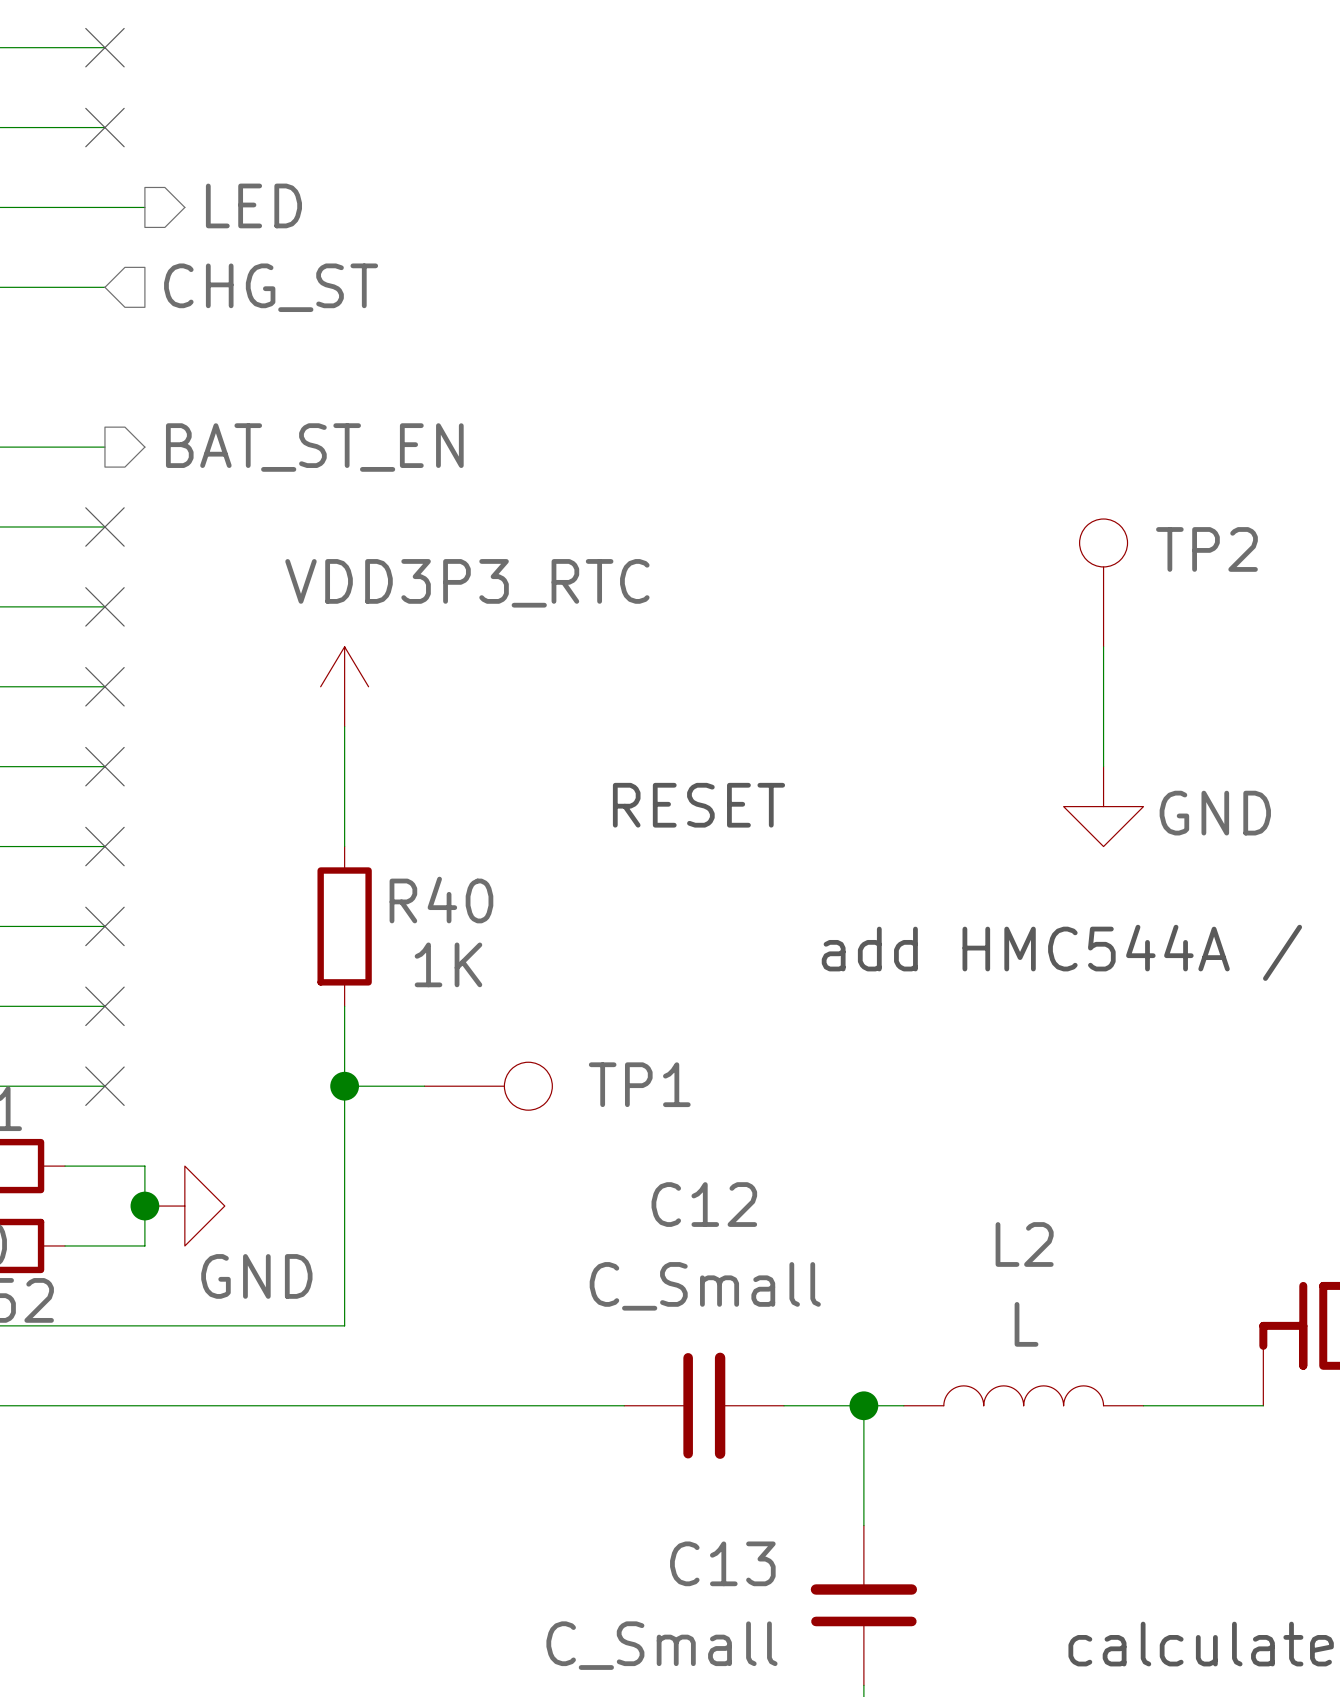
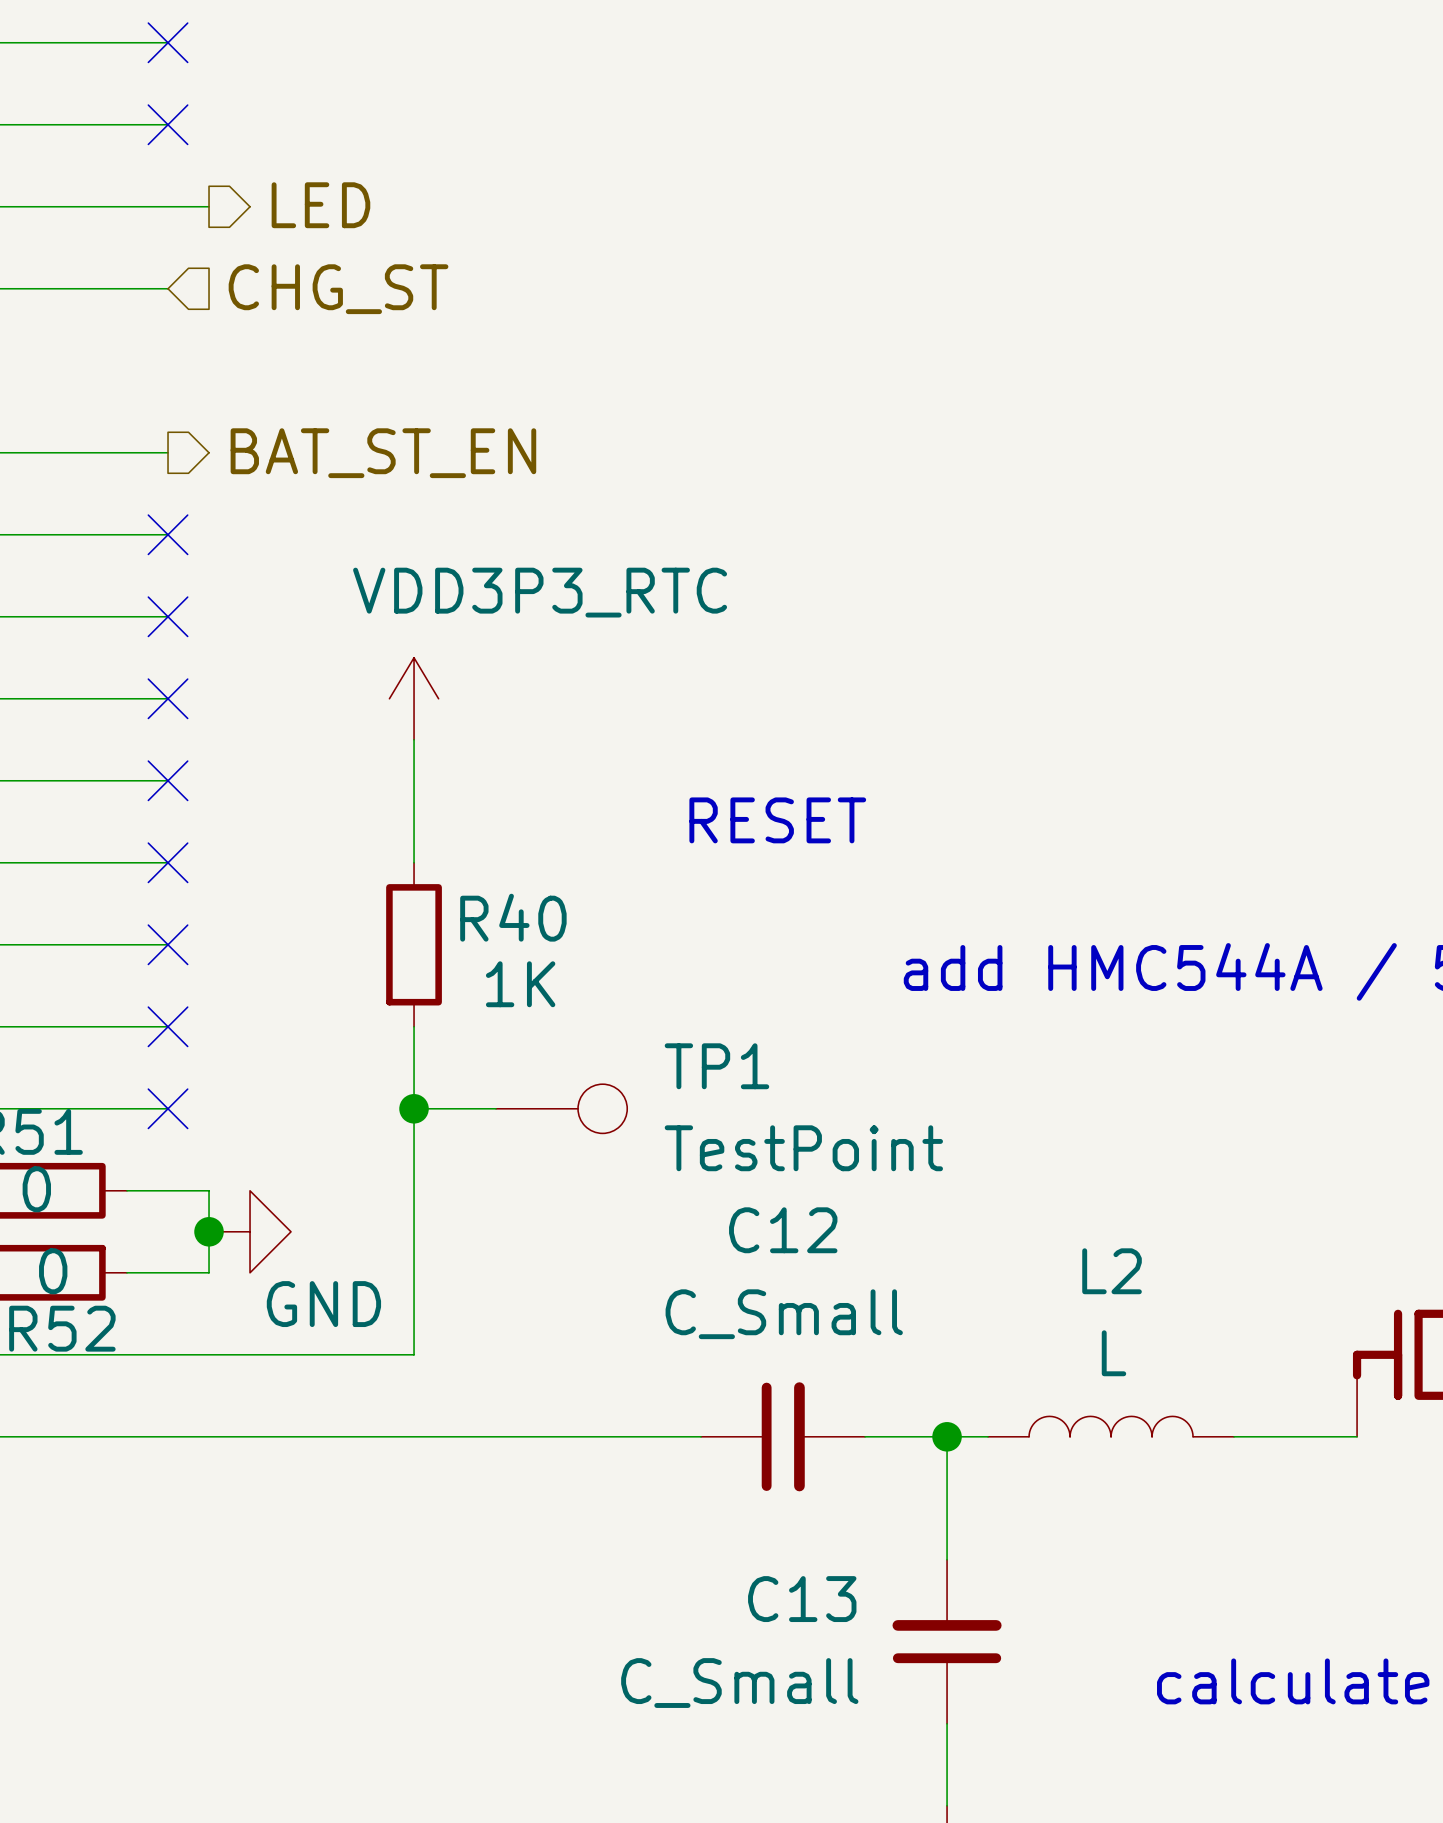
TP2: (1103, 582) -> none
wire: (1103, 646) (1103, 766) -> none
power symbol: GND (1103, 806) -> none
TP1 name position: TP1 (639, 1084) -> TP1 (716, 1066)
TP1 value: none -> TestPoint (803, 1148)

